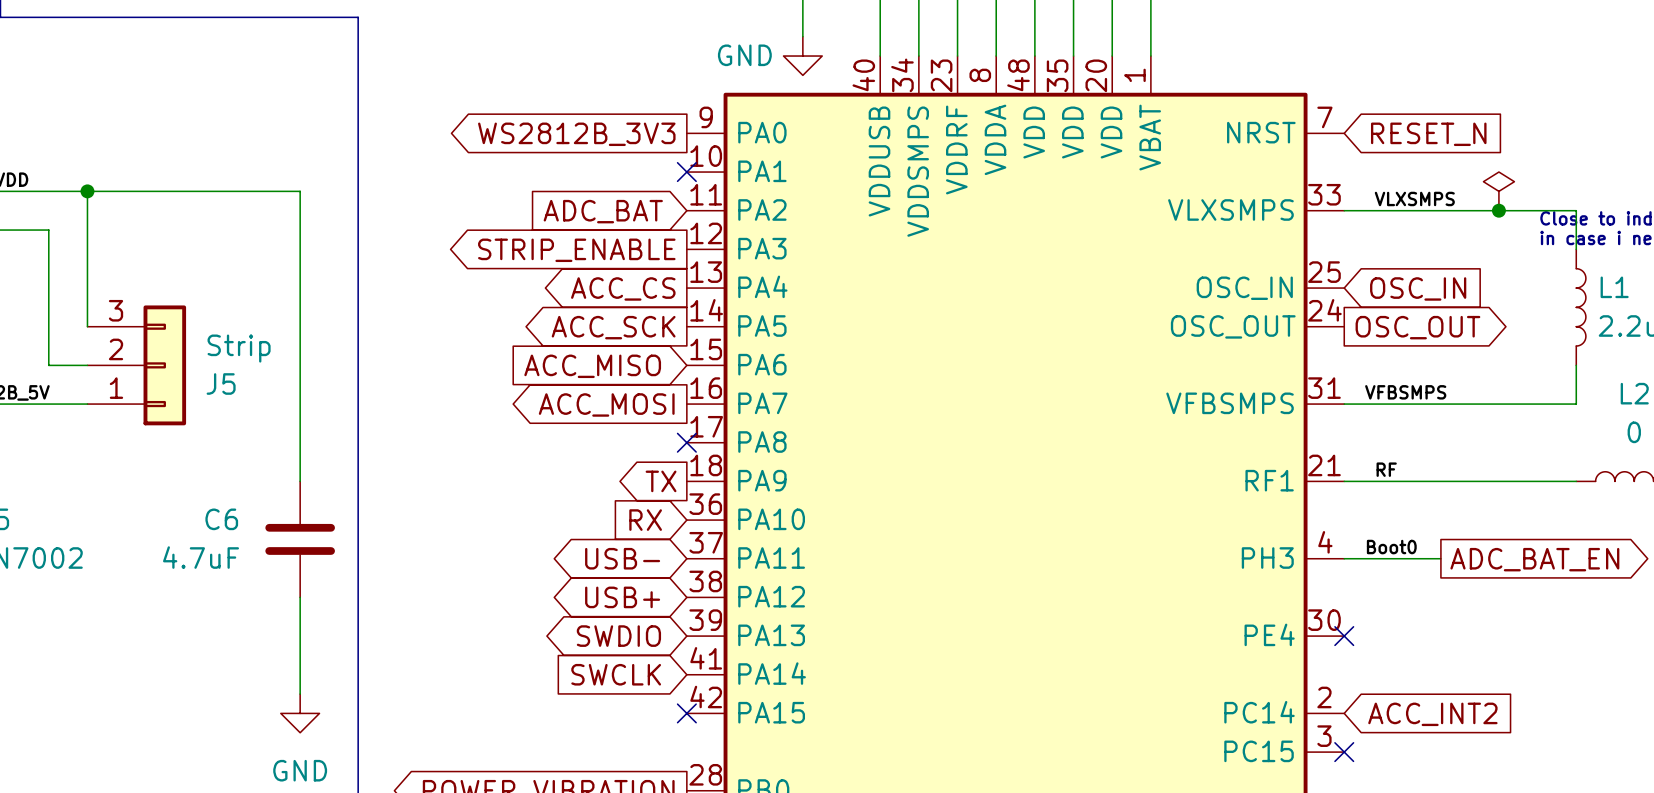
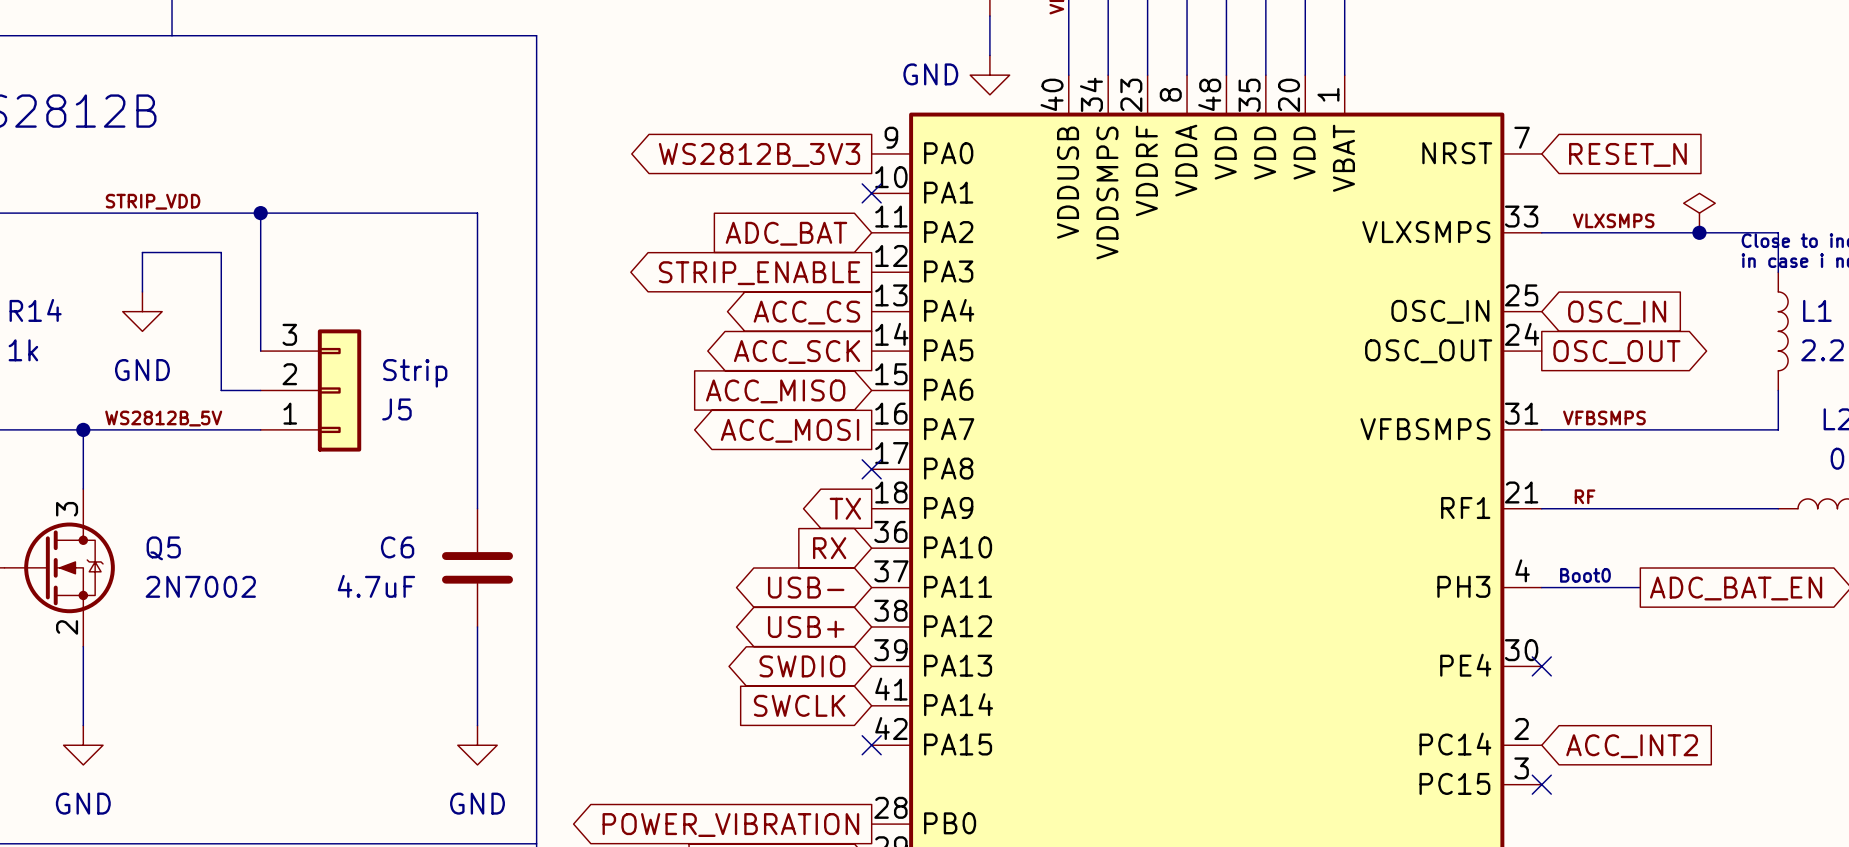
text: none -> Boot0 (1585, 575)
label: Boot0 (1391, 547) -> none

